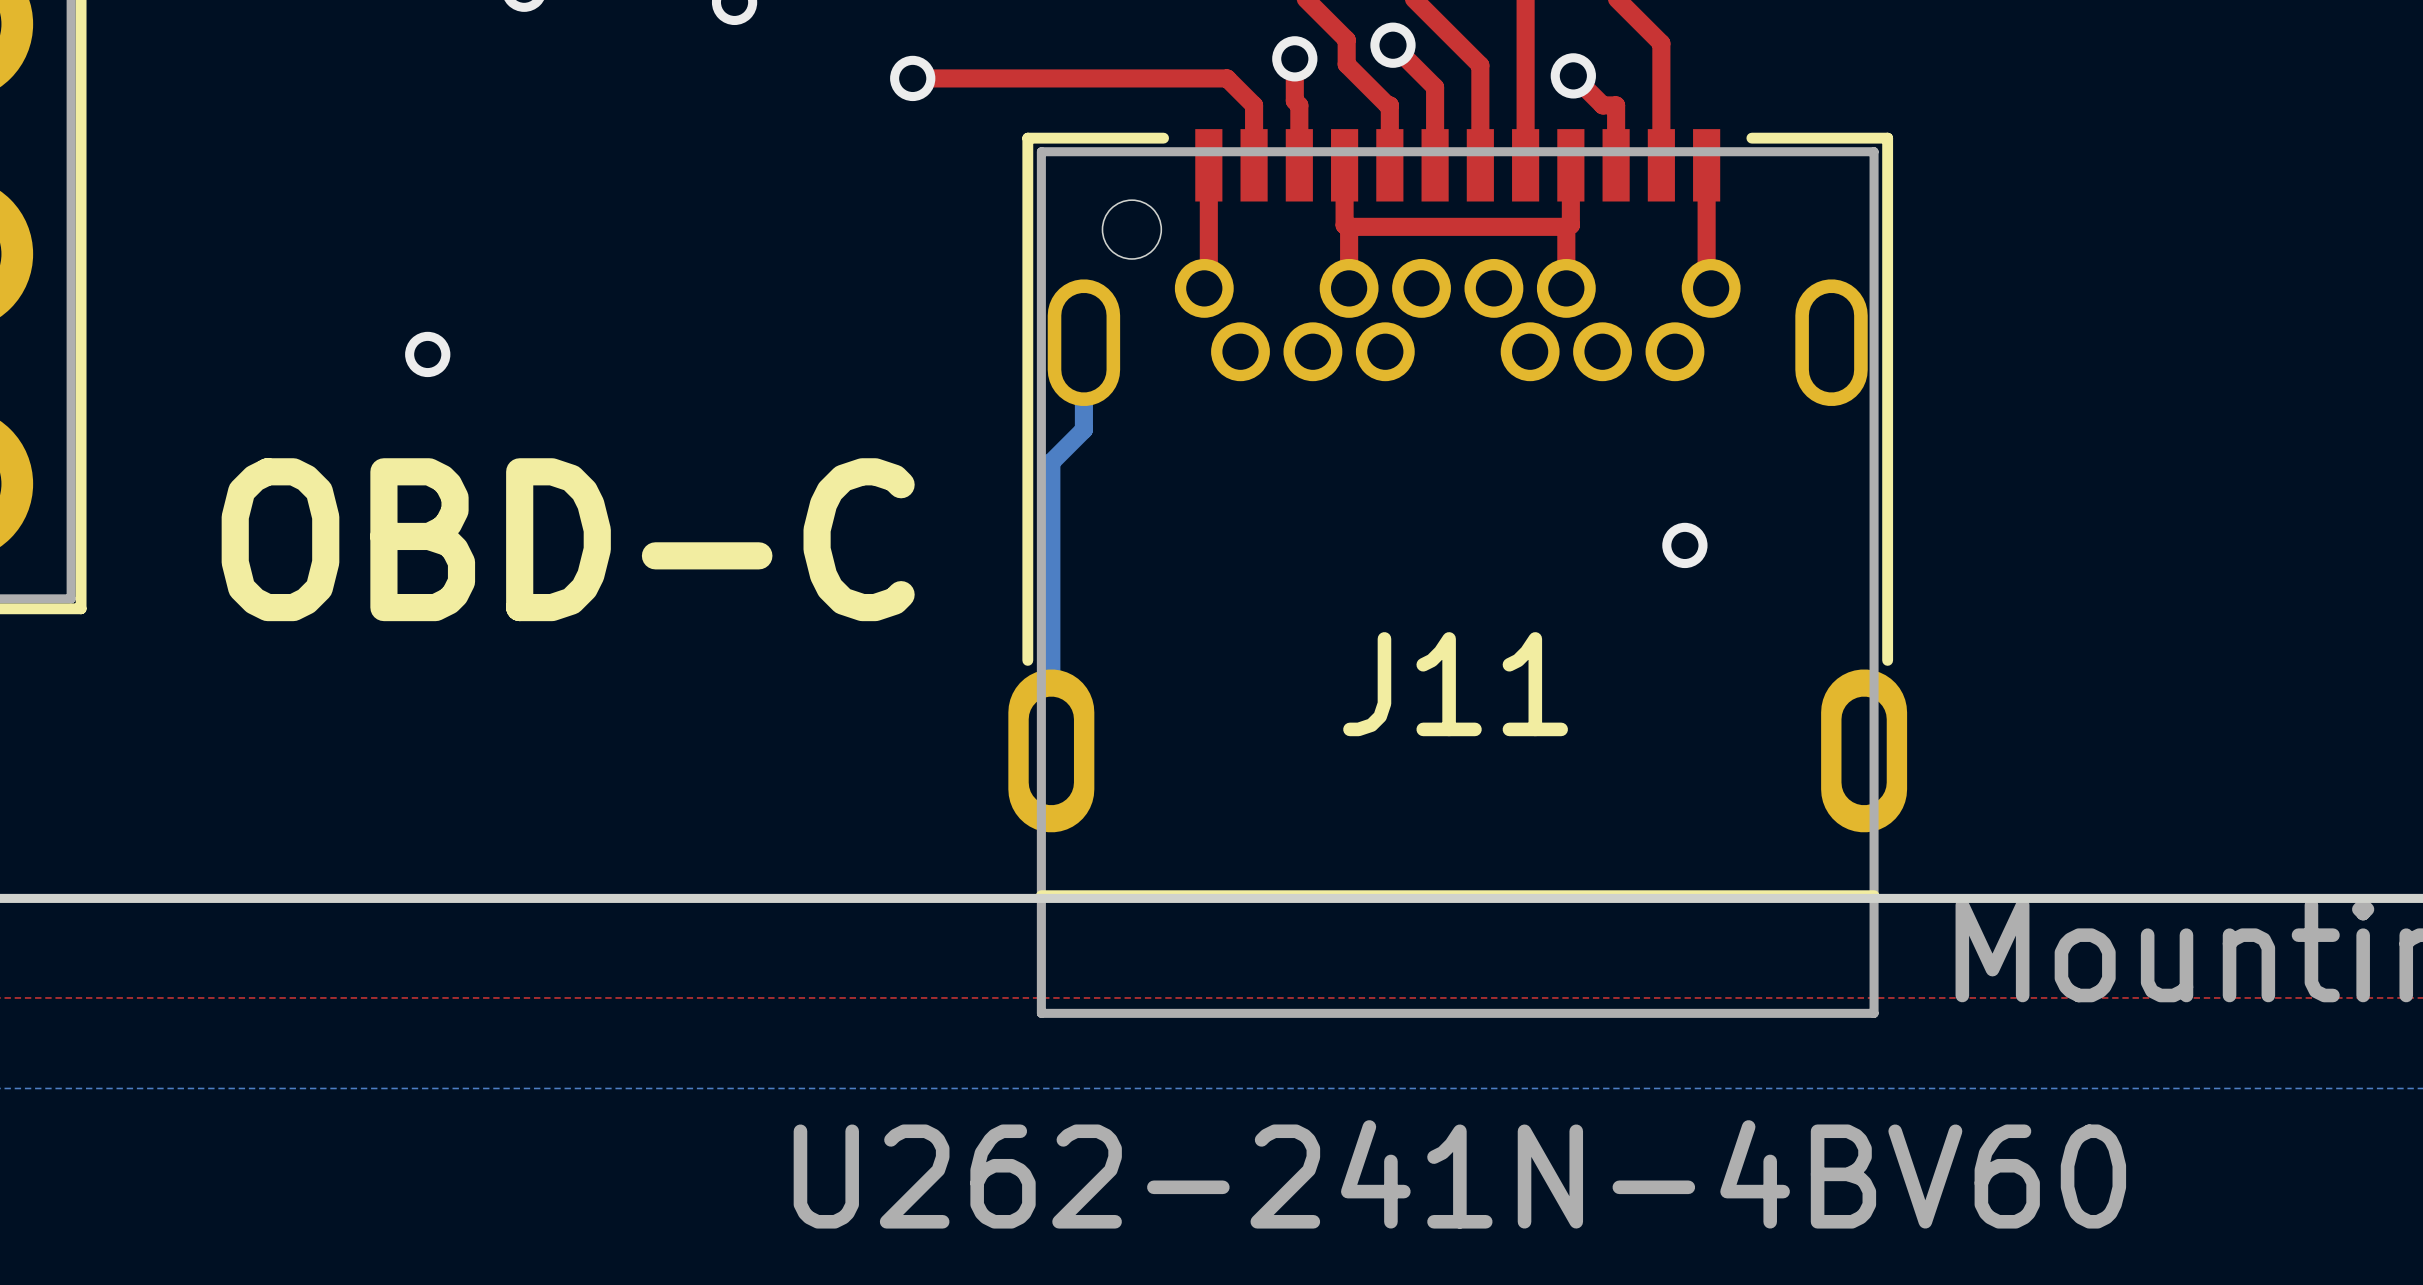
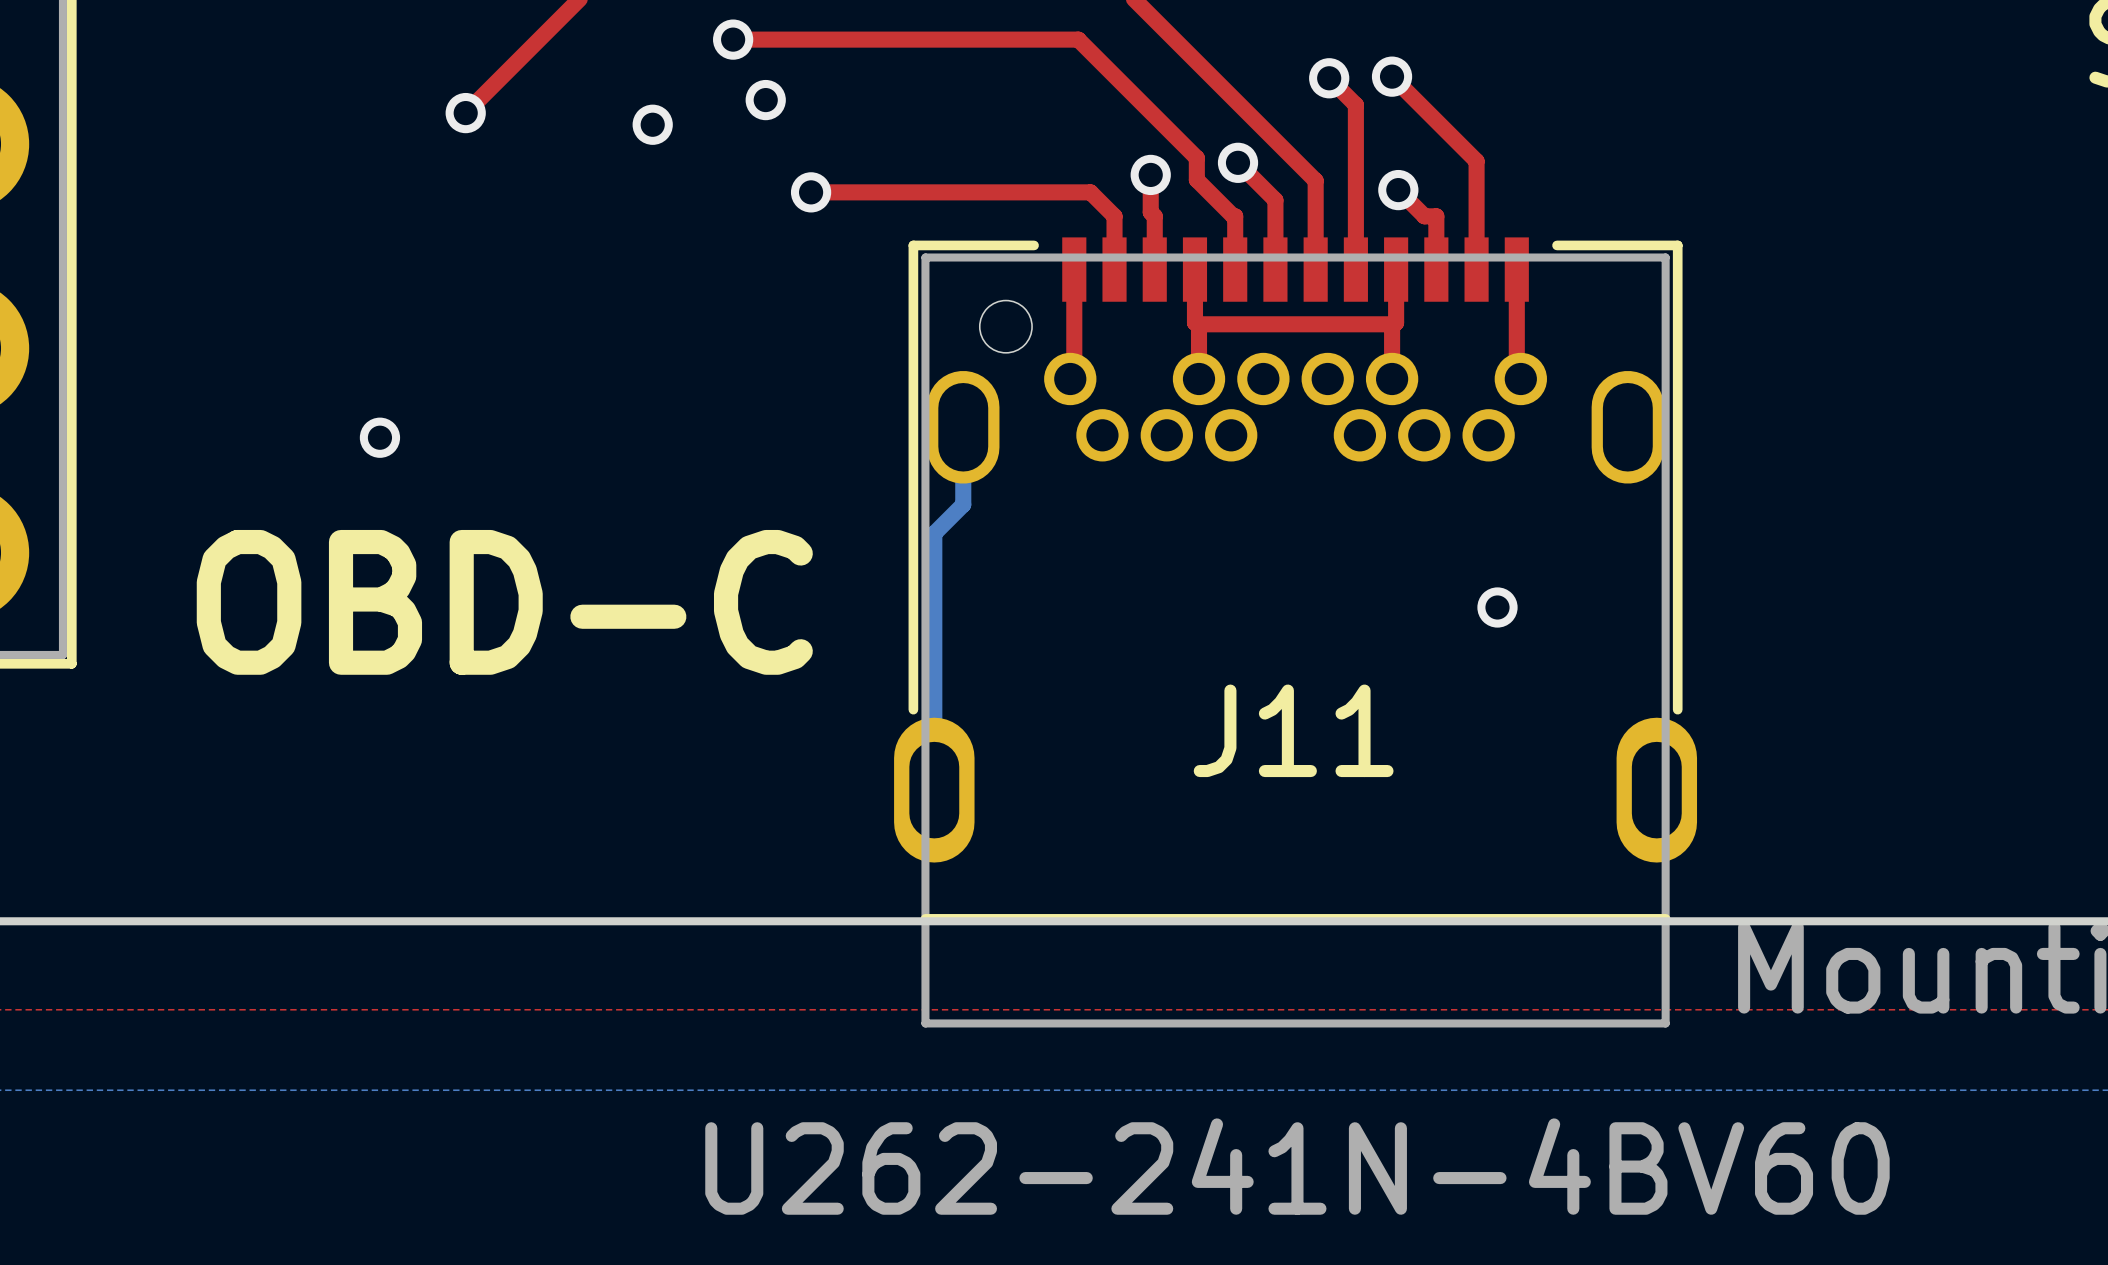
J11 footprint: [1008, 129, 1908, 1018] -> [894, 237, 1698, 1028]

